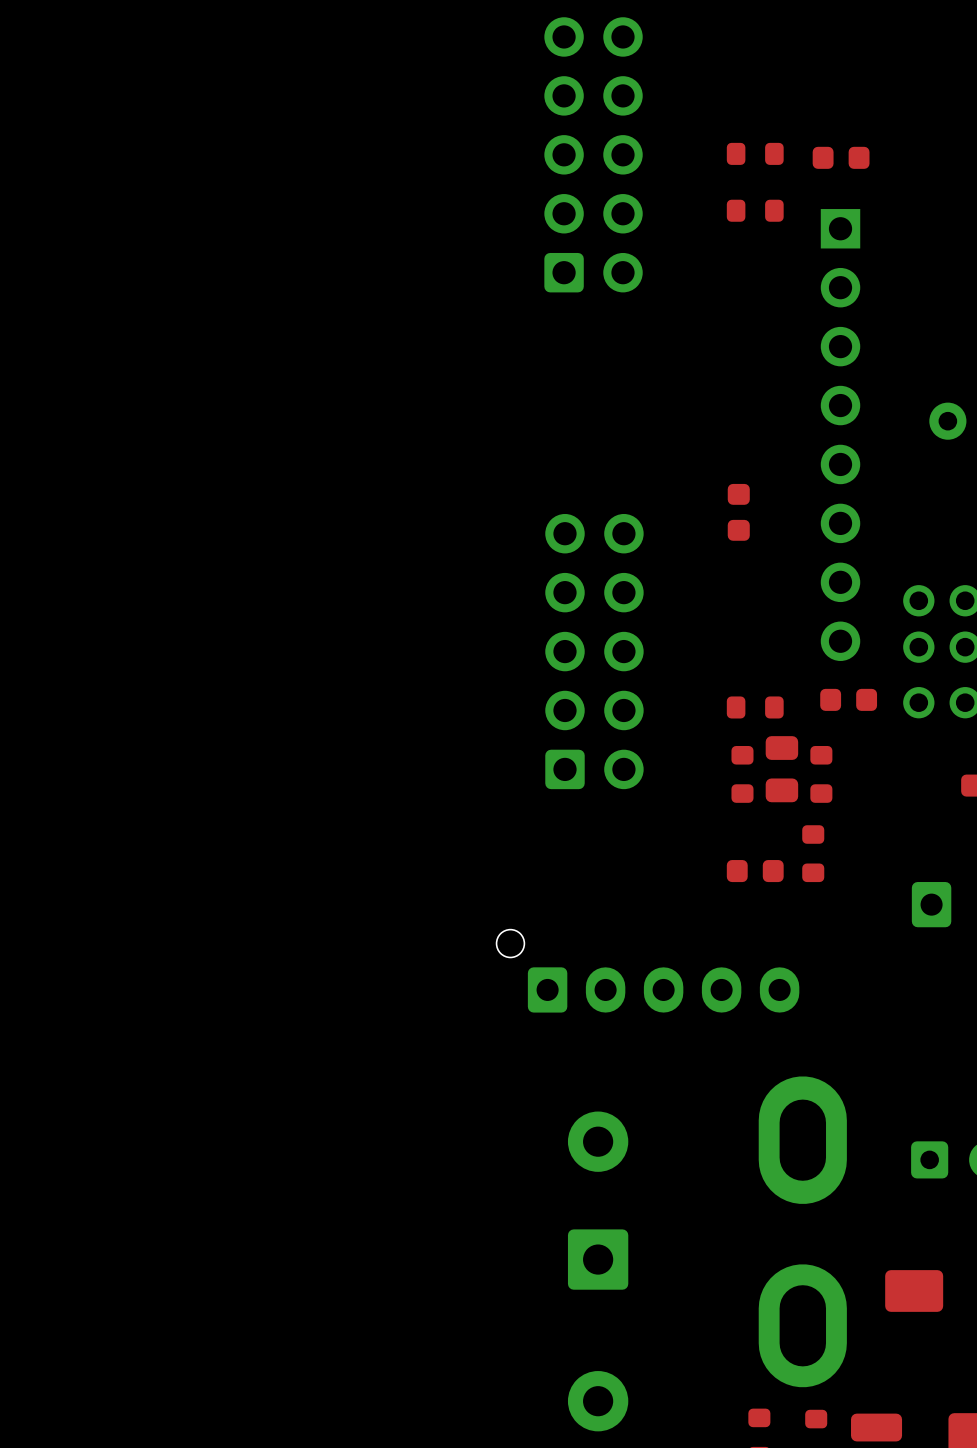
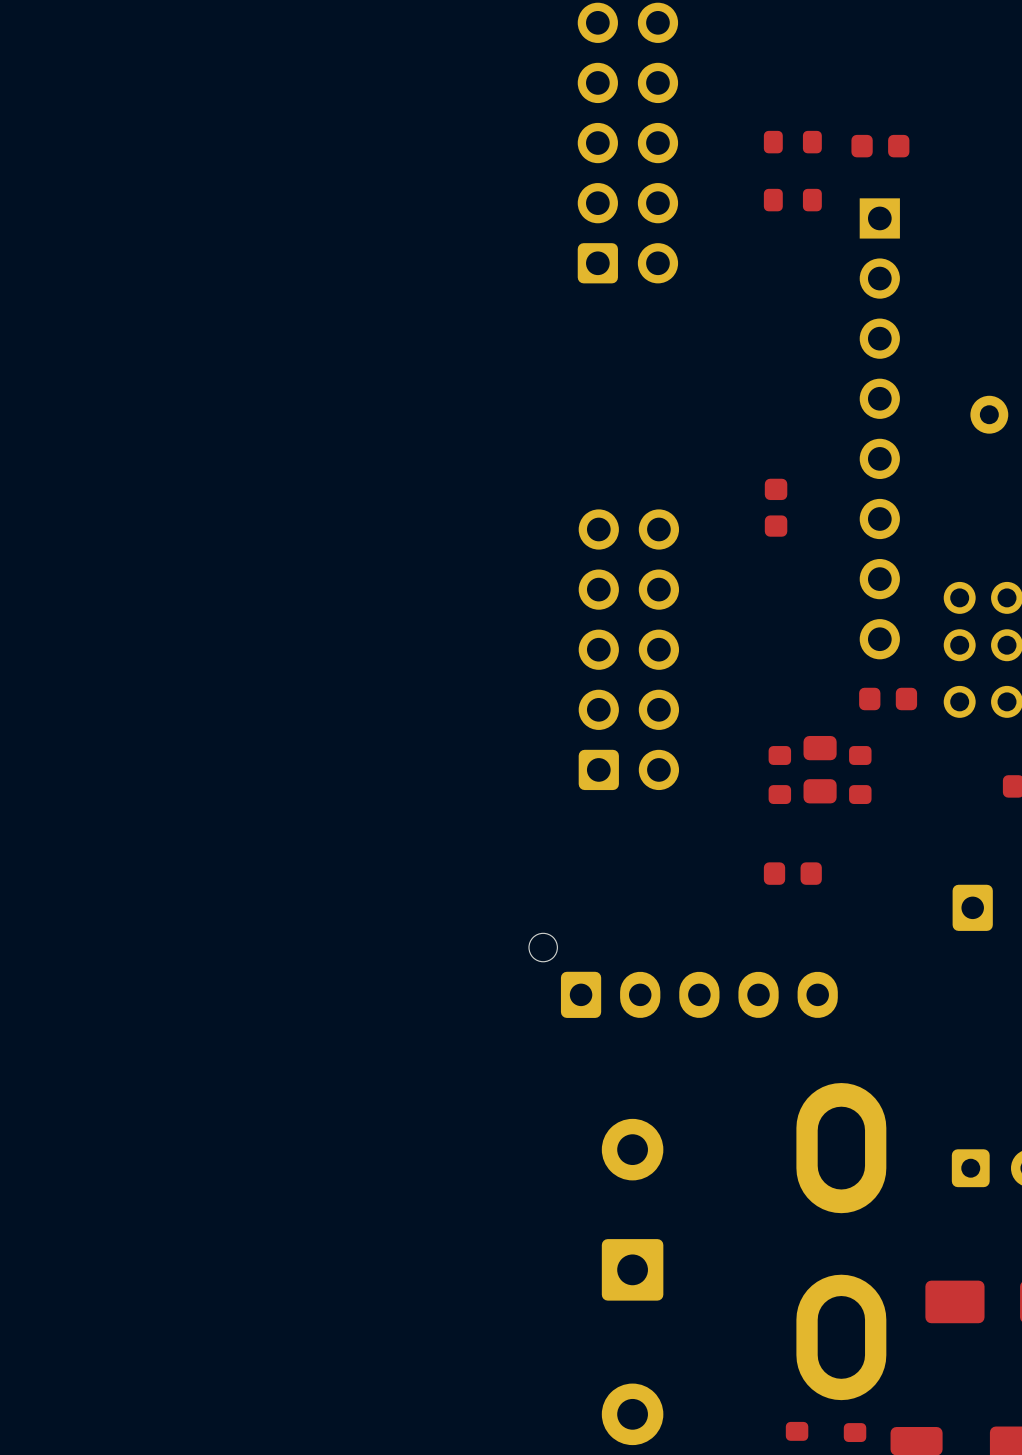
part: (755, 707) -> none
part: (813, 853) -> none

